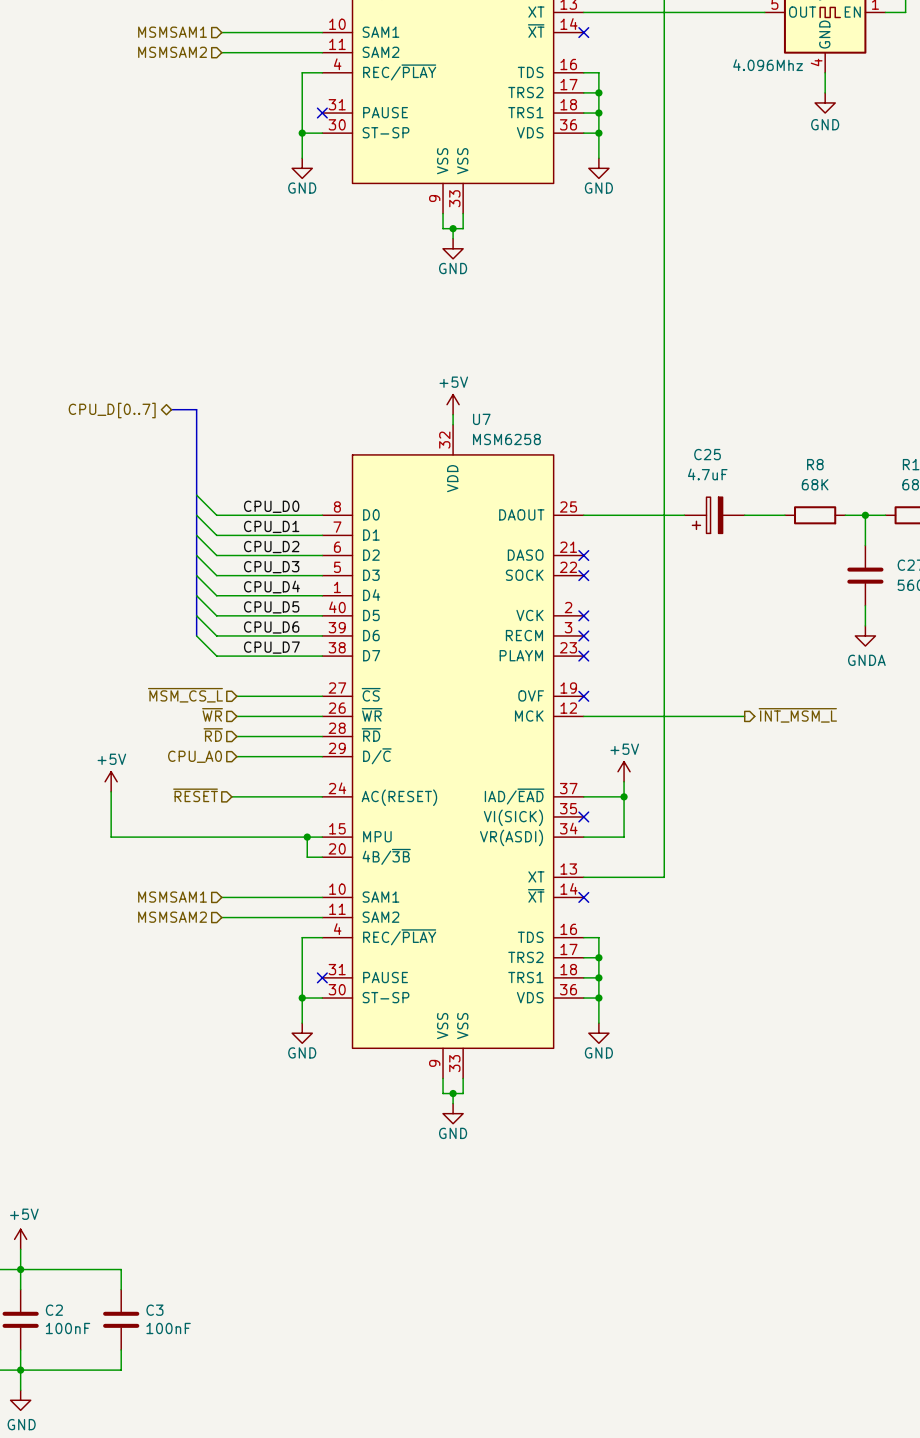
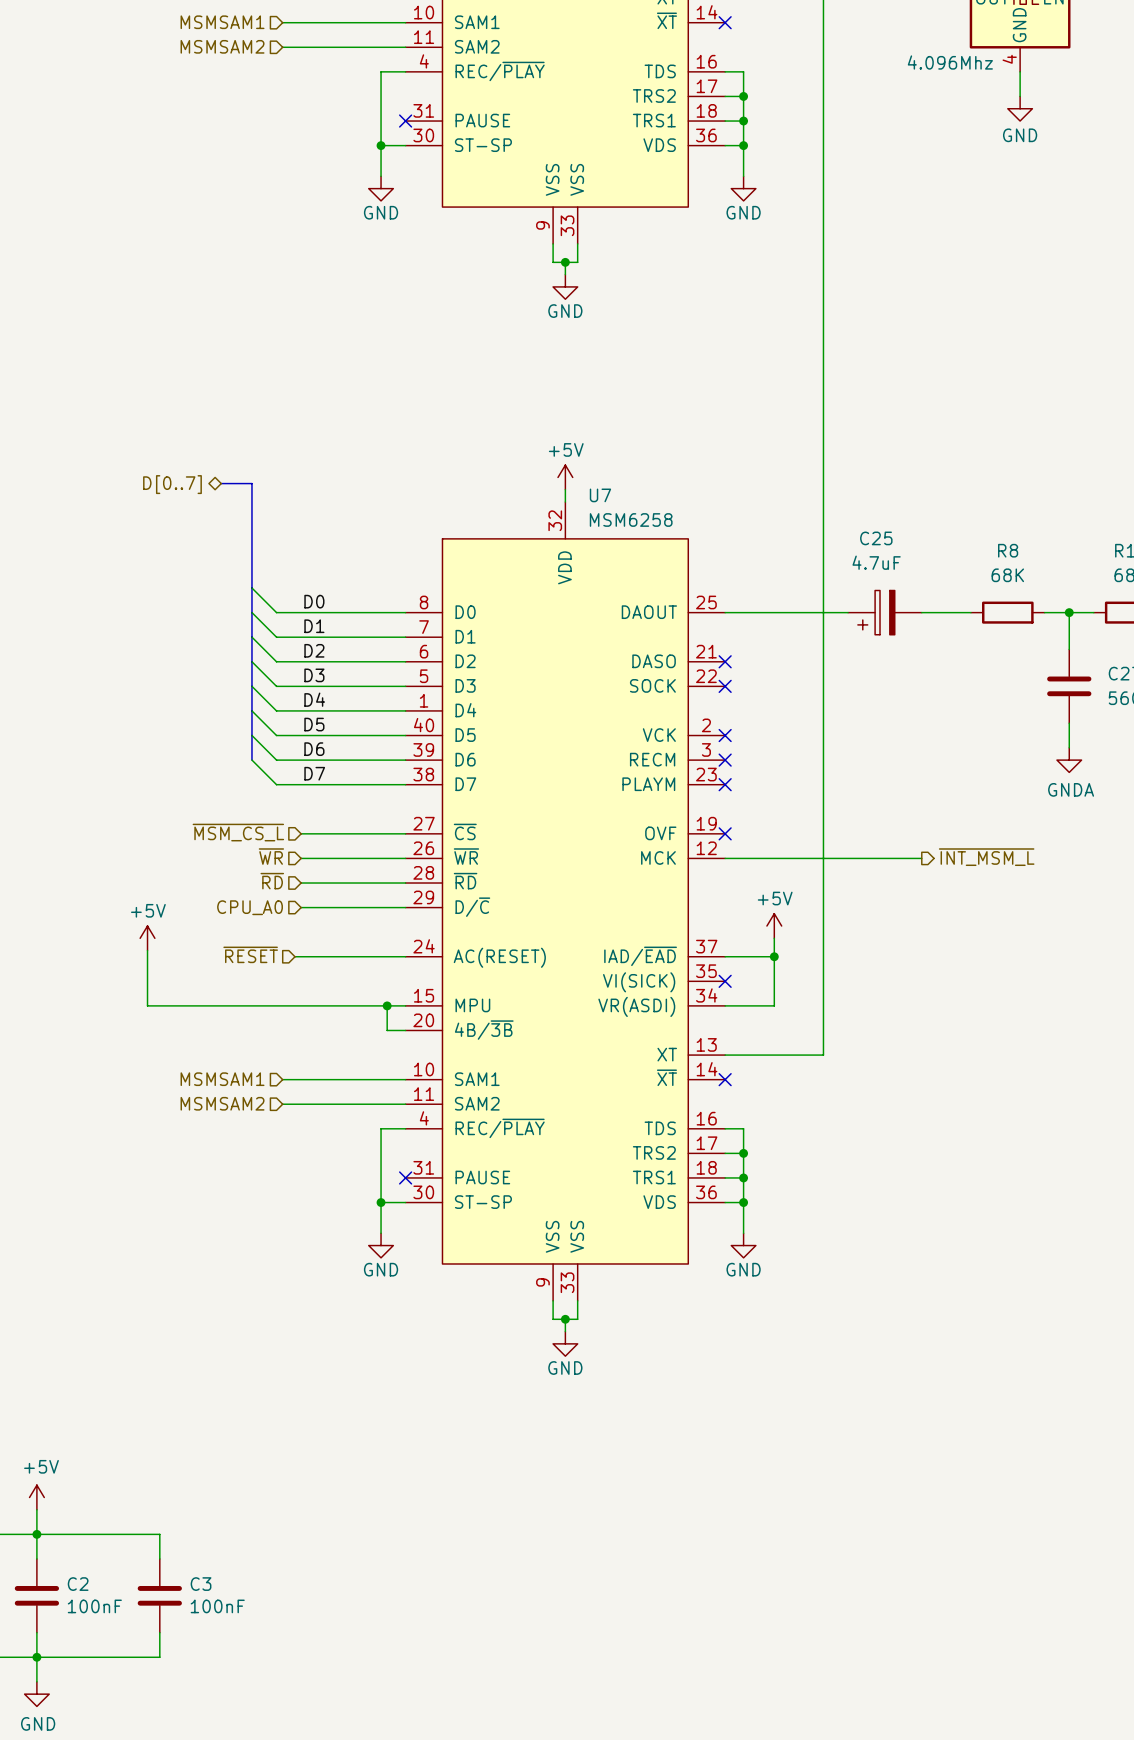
hierarchical label: CPU_D[0..7] (112, 410) -> D[0..7] (172, 484)
label: CPU_D0 (271, 506) -> D0 (314, 601)
label: CPU_D1 (271, 526) -> D1 (314, 626)
label: CPU_D2 (271, 547) -> D2 (314, 650)
label: CPU_D3 (271, 567) -> D3 (314, 675)
label: CPU_D4 (271, 587) -> D4 (314, 699)
label: CPU_D5 (271, 607) -> D5 (314, 724)
label: CPU_D6 (271, 627) -> D6 (314, 749)
label: CPU_D7 (271, 647) -> D7 (314, 773)

